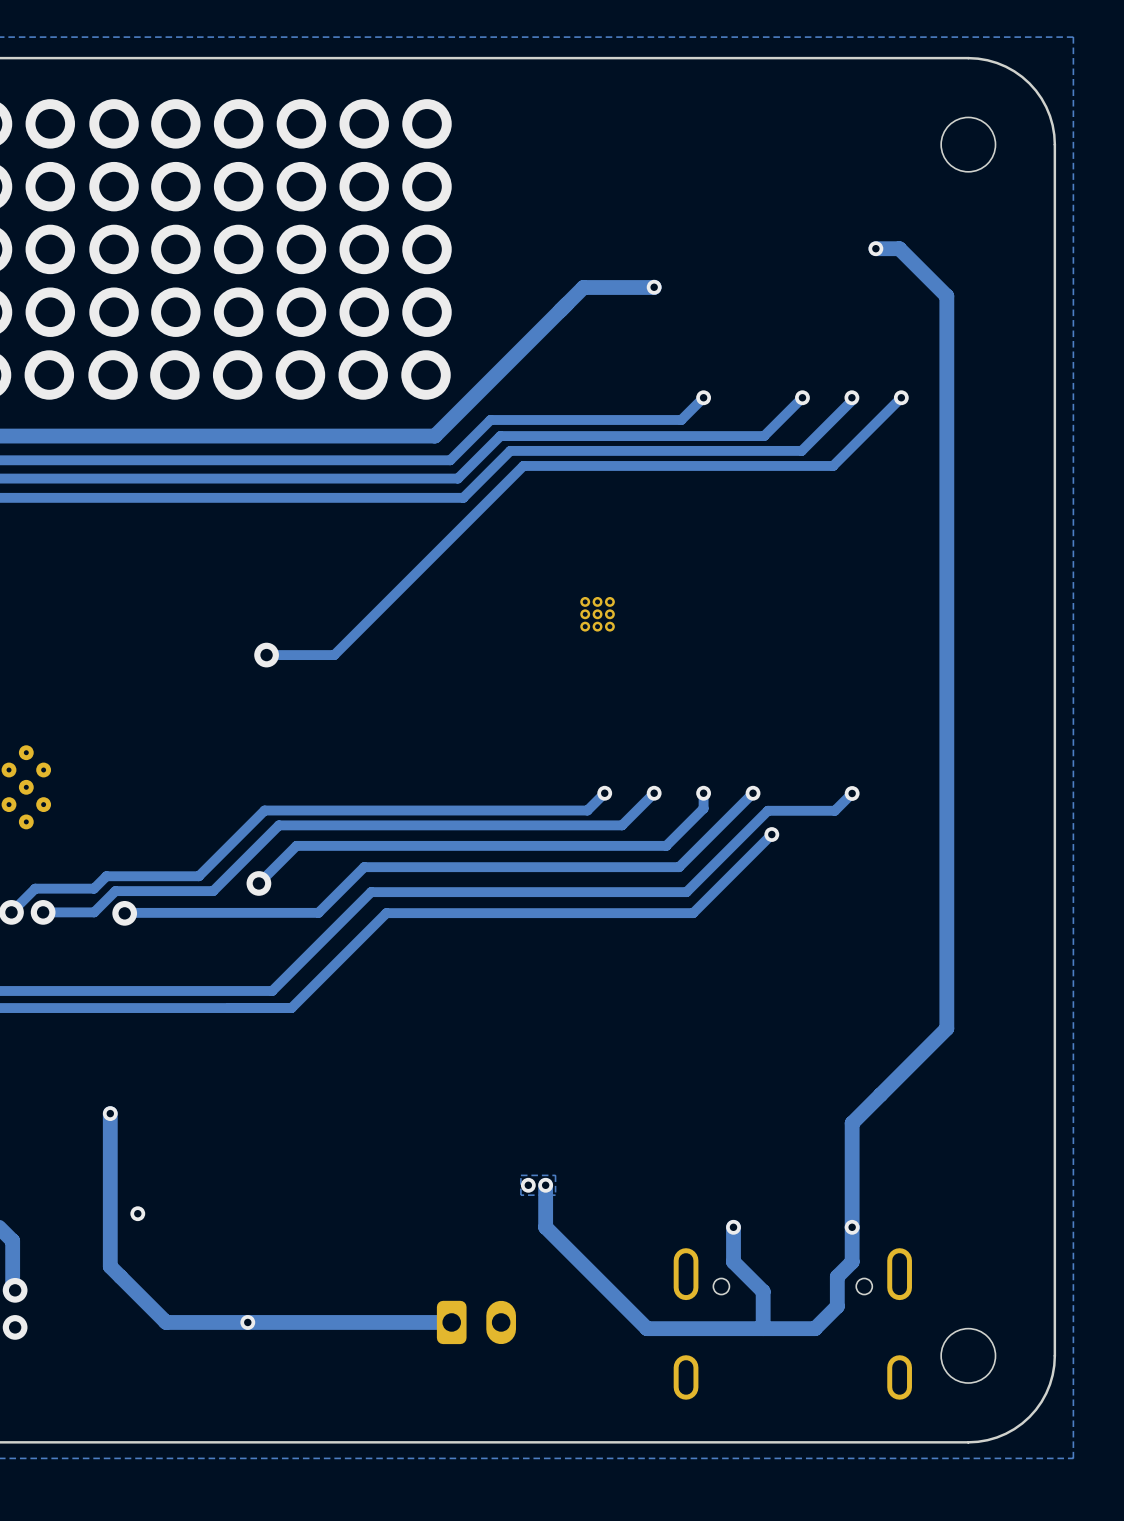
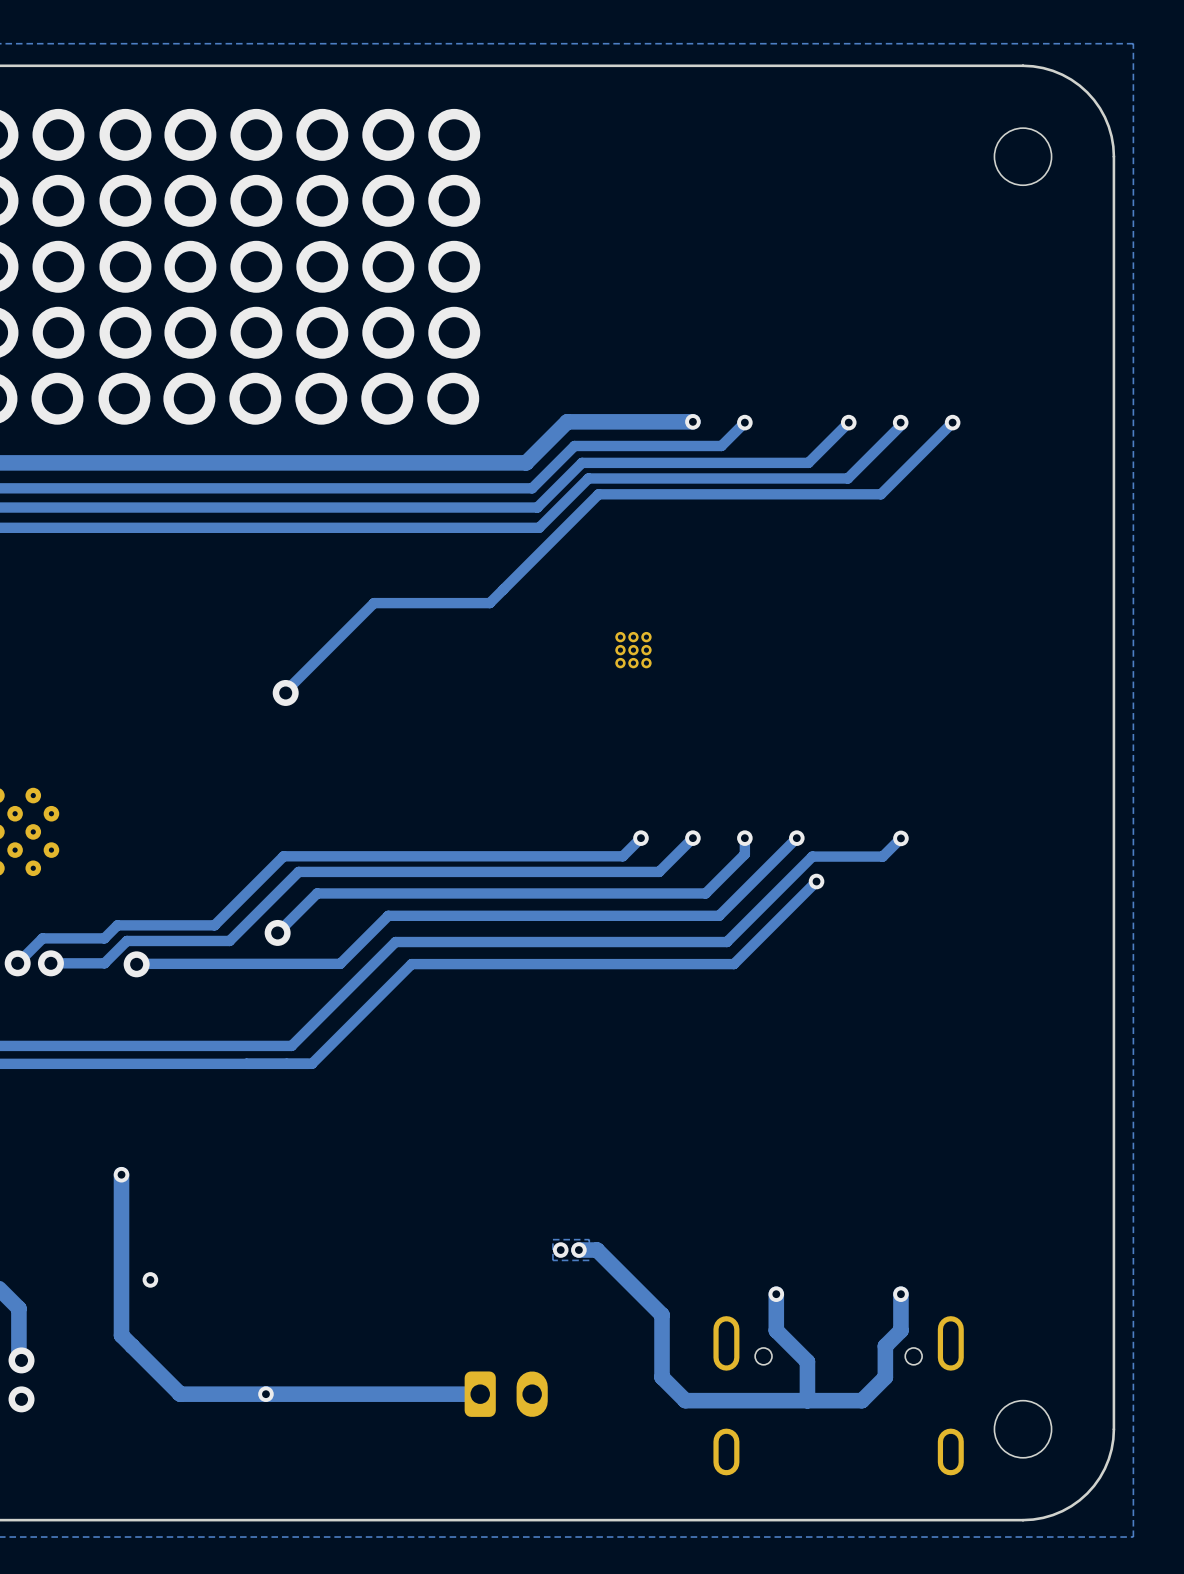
track: (875, 248) (899, 248) (946, 296) (946, 1028) (852, 1123) (852, 1227) -> none
via: (875, 248) -> none
track: (653, 287) (583, 287) (434, 436) -> (692, 421) (567, 421) (526, 462) (462, 462)
via position: (654, 287) -> (692, 421)
track: (541, 419) (490, 419) (450, 460) -> (574, 445) (532, 488) (478, 488)
track: (548, 436) (500, 436) (457, 478) -> (582, 462) (537, 507) (486, 507)
track: (554, 450) (510, 450) (463, 497) -> (588, 478) (539, 527) (492, 527)
track: (564, 465) (523, 465) (334, 655) (266, 655) -> (598, 494) (489, 603) (374, 603) (285, 692)
track: (545, 1185) (545, 1227) (624, 1306) -> (578, 1250) (597, 1250) (662, 1314) (662, 1377)

